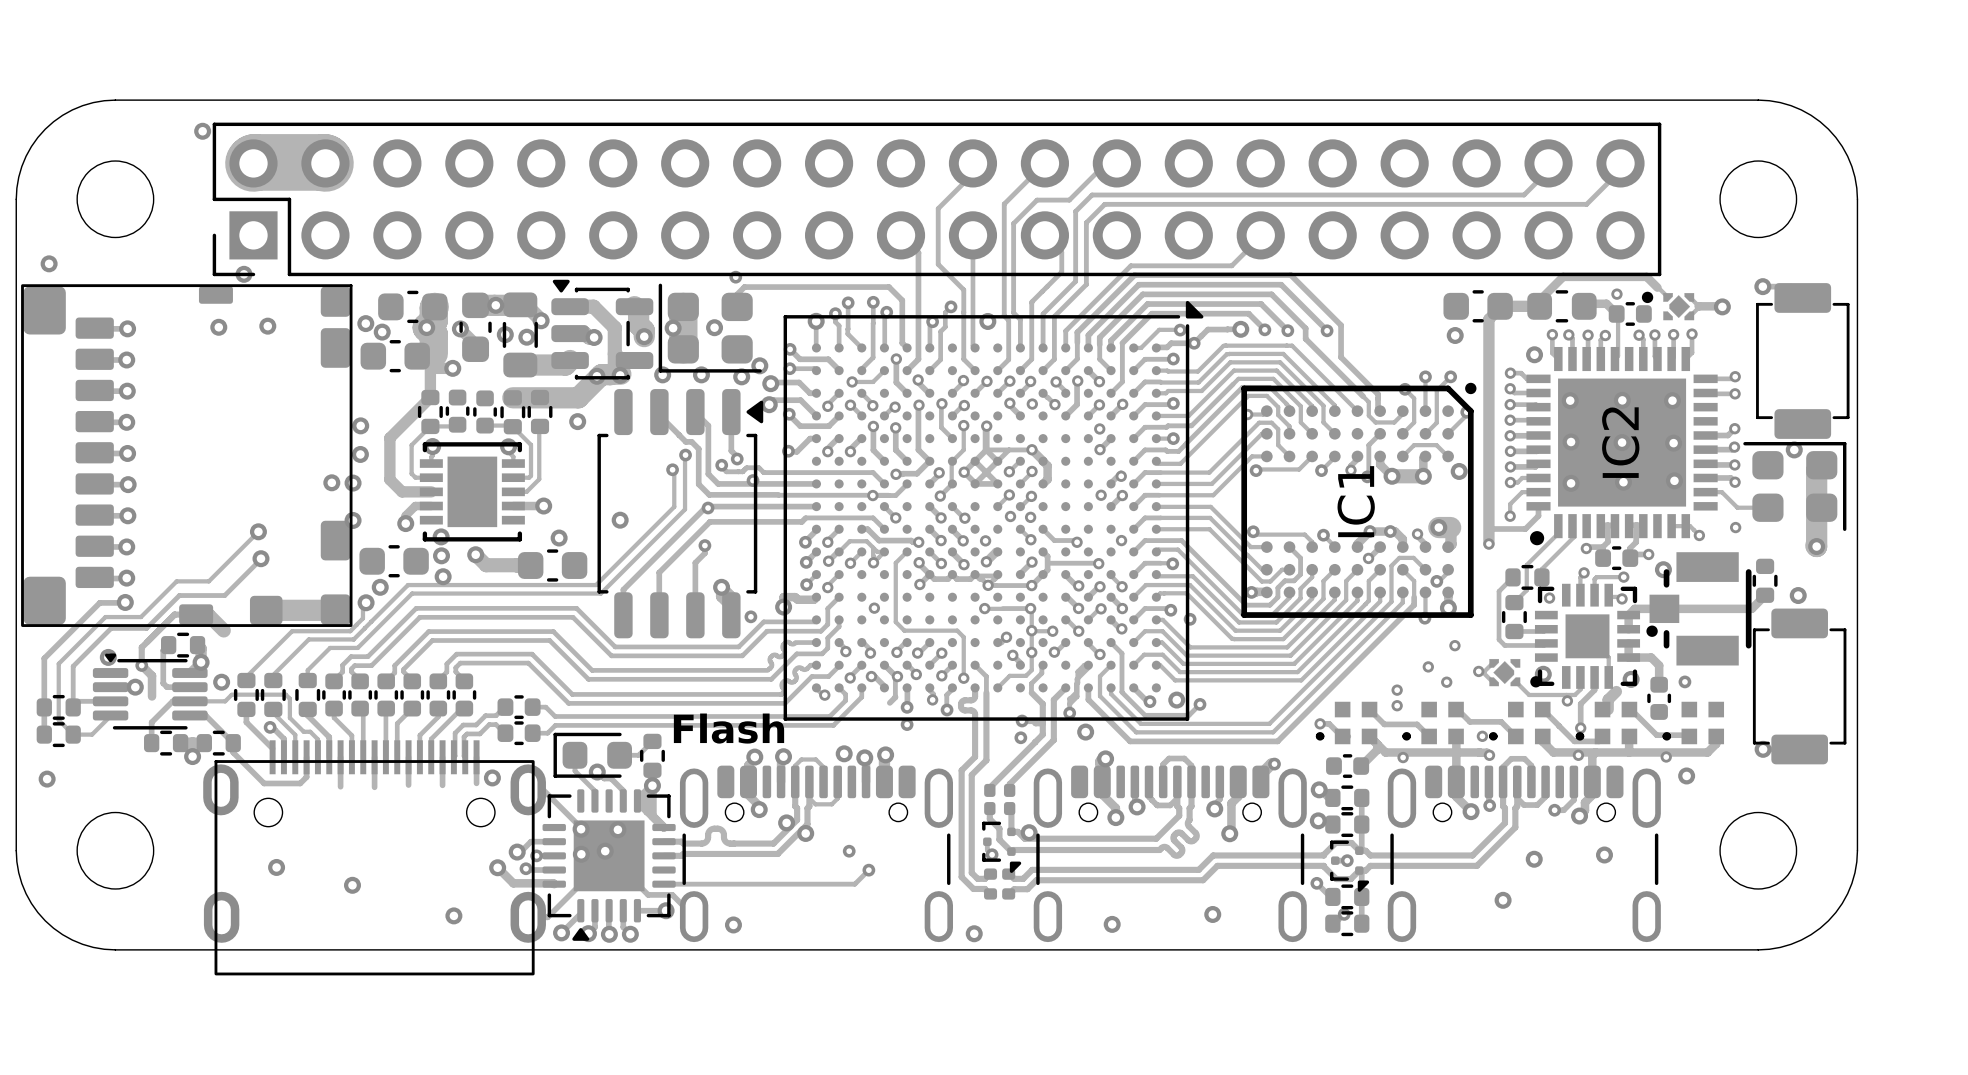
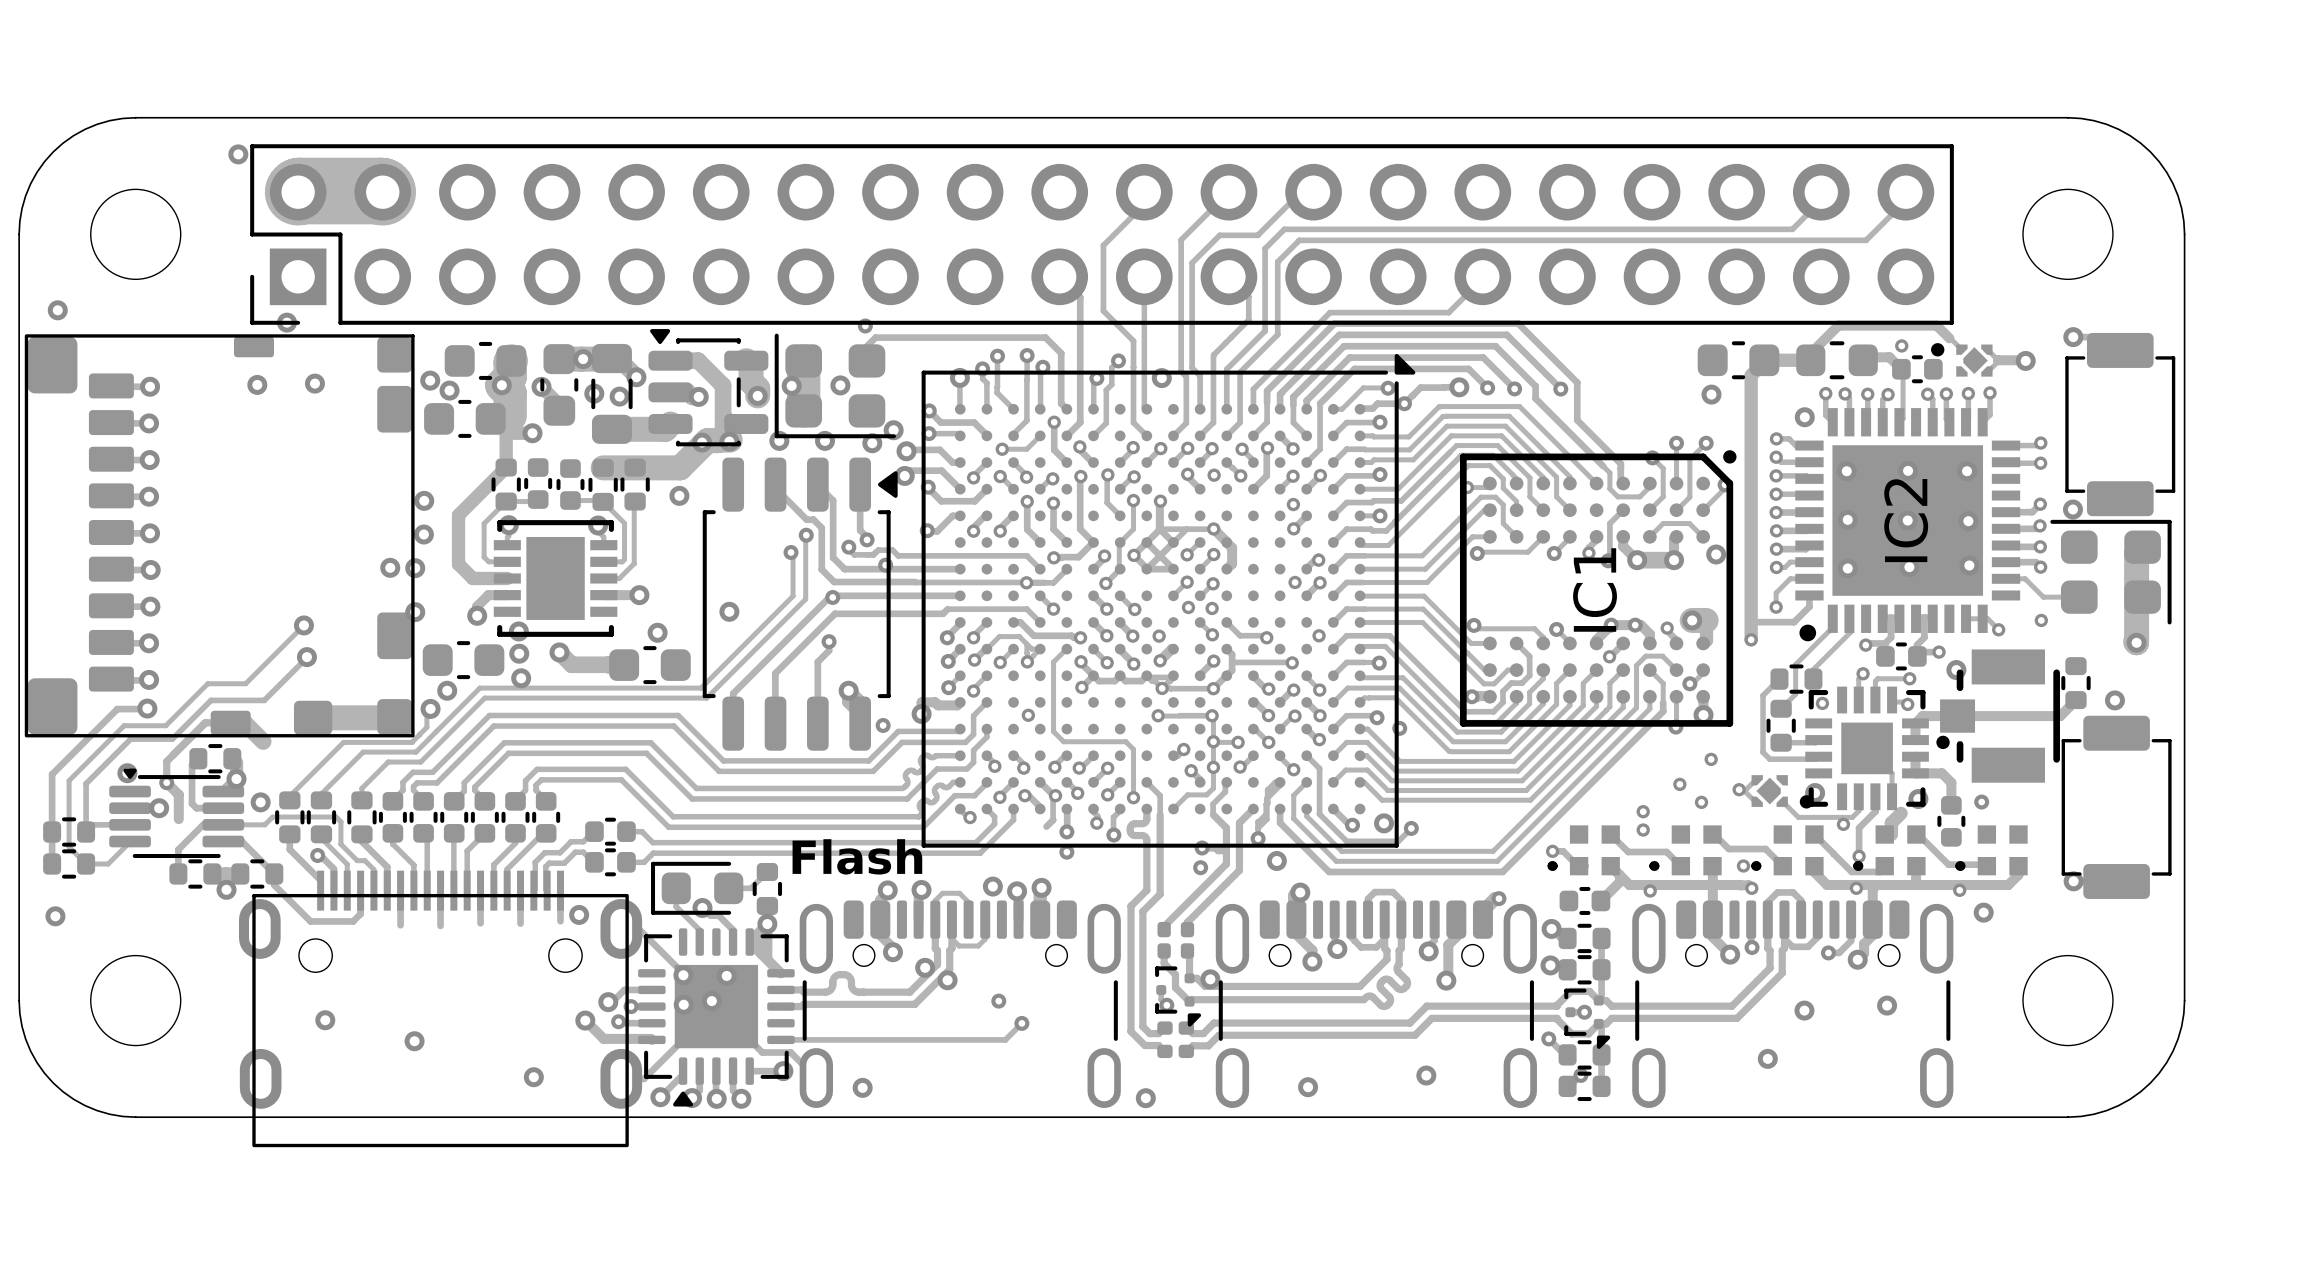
via position: (1794, 449) -> (2072, 509)

